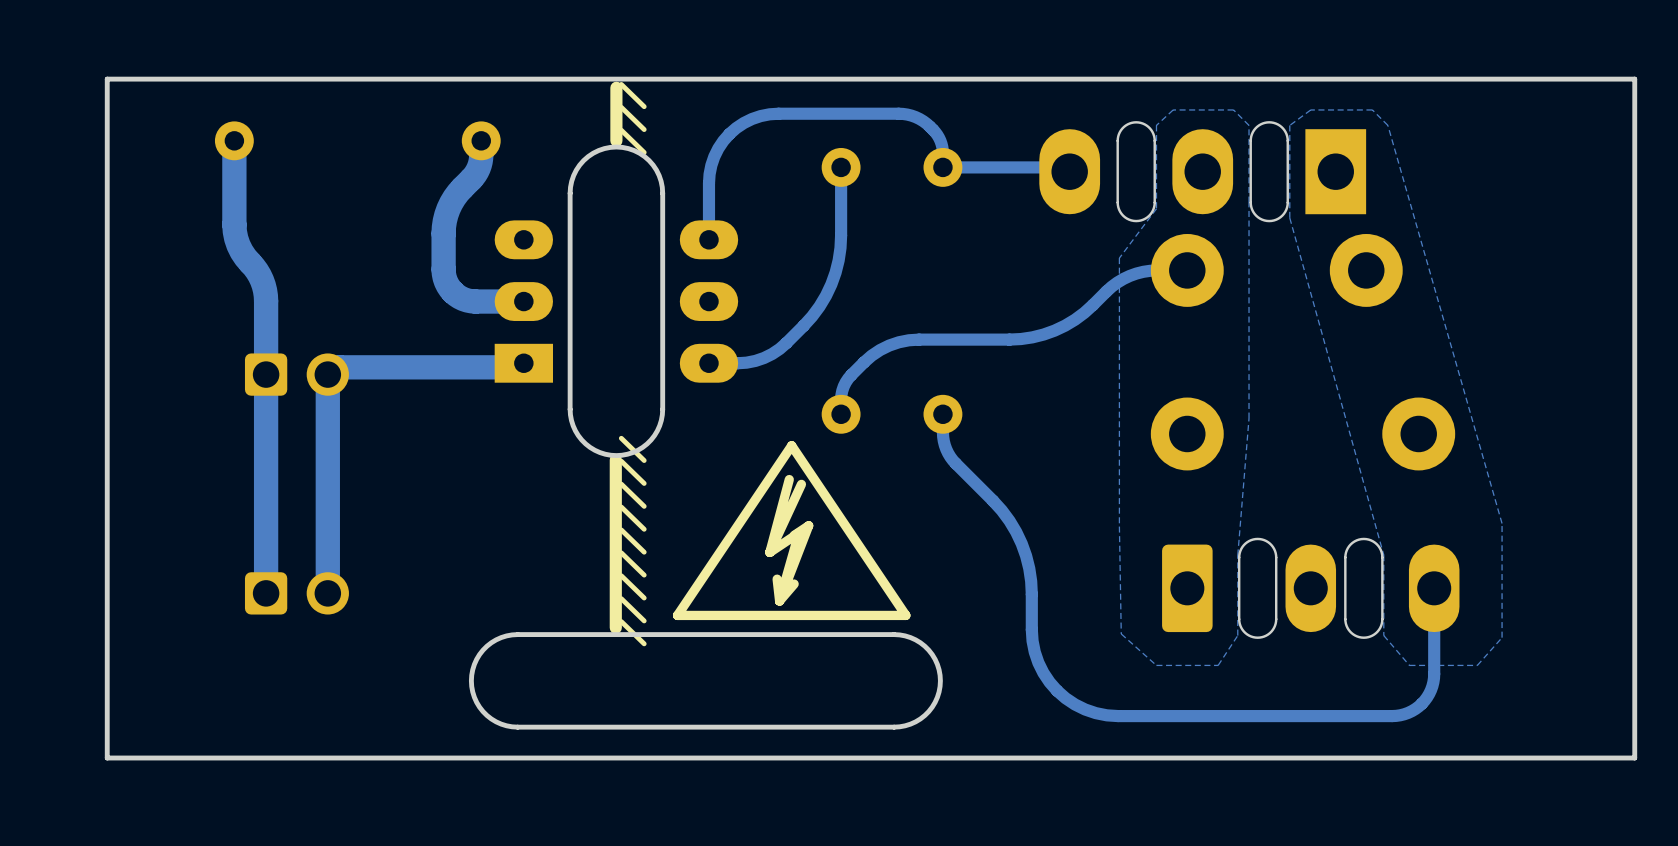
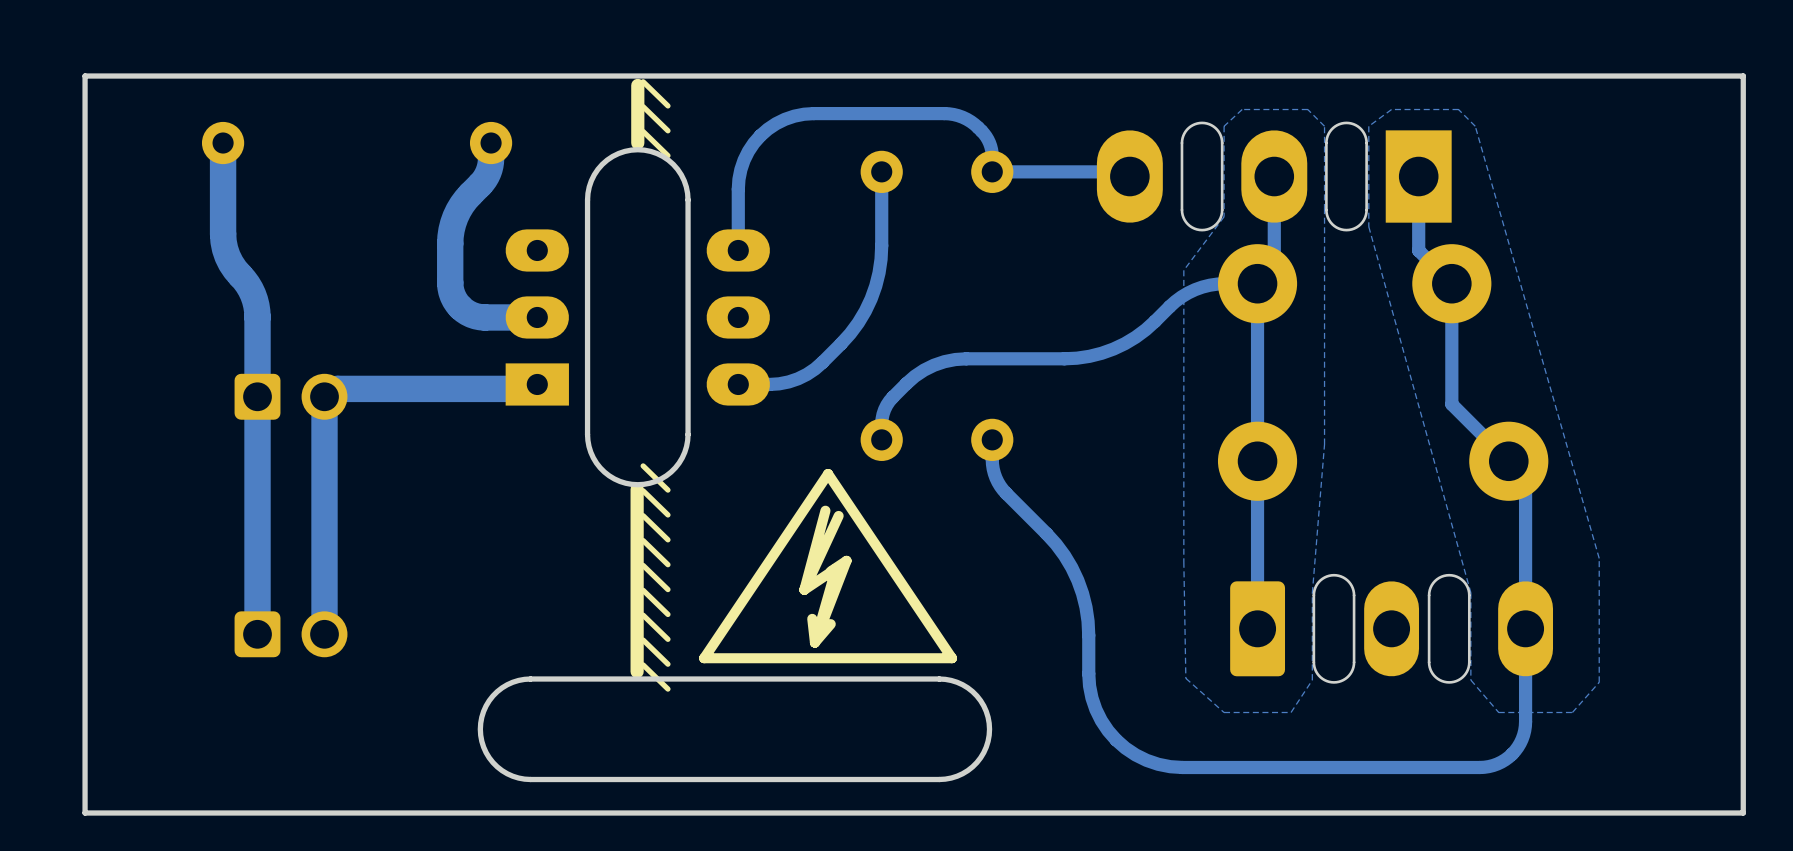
bottom track: none -> (1274, 176) (1274, 266) (1257, 283) (1257, 628)
bottom track: none -> (1418, 176) (1418, 250) (1451, 283) (1451, 404) (1508, 461) (1508, 472) (1525, 488) (1525, 628)

